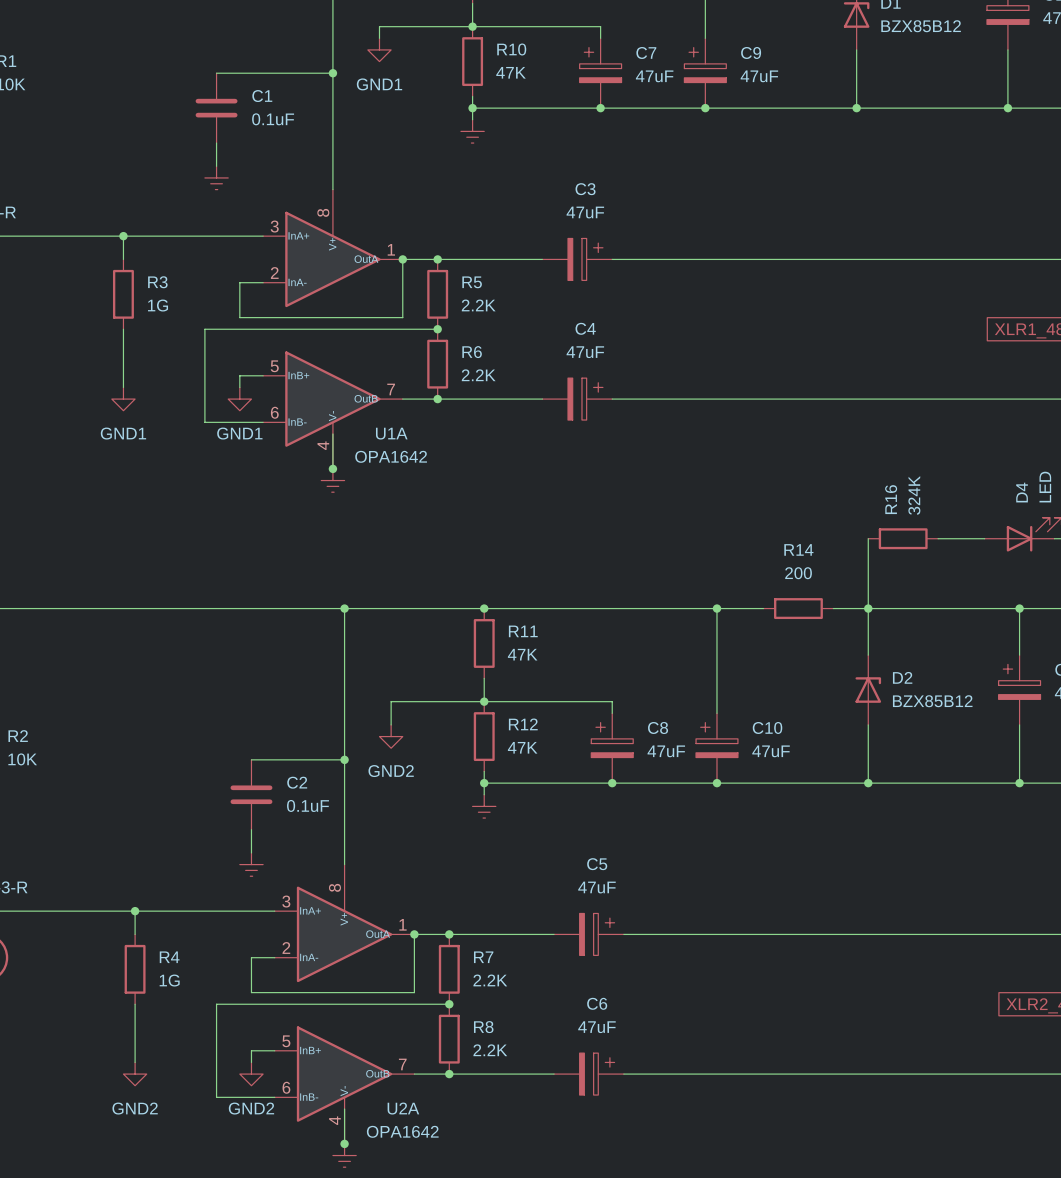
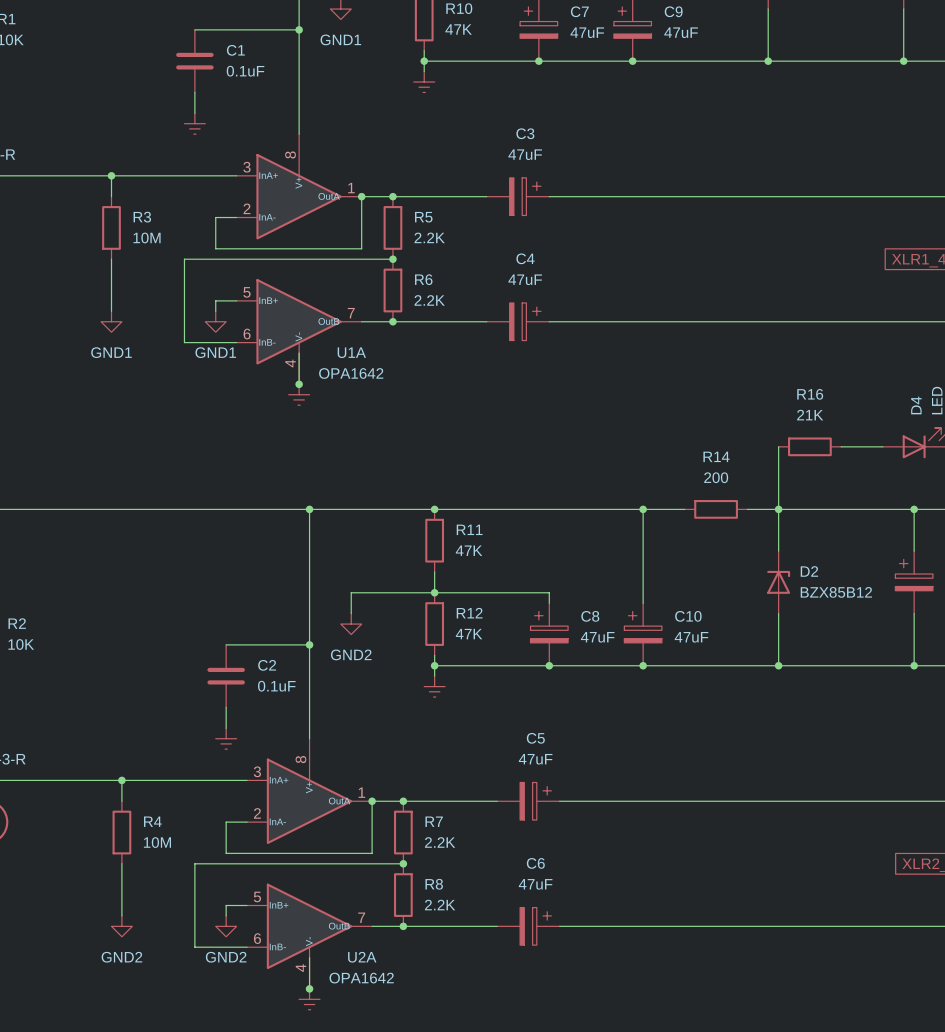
R3 value: 1G (158, 305) -> 10M (147, 237)
R16 value: 324K (914, 495) -> 21K (810, 415)
R16 name rotation: 0° (891, 499) -> 90° clockwise (810, 394)
R4 value: 1G (169, 980) -> 10M (157, 842)

